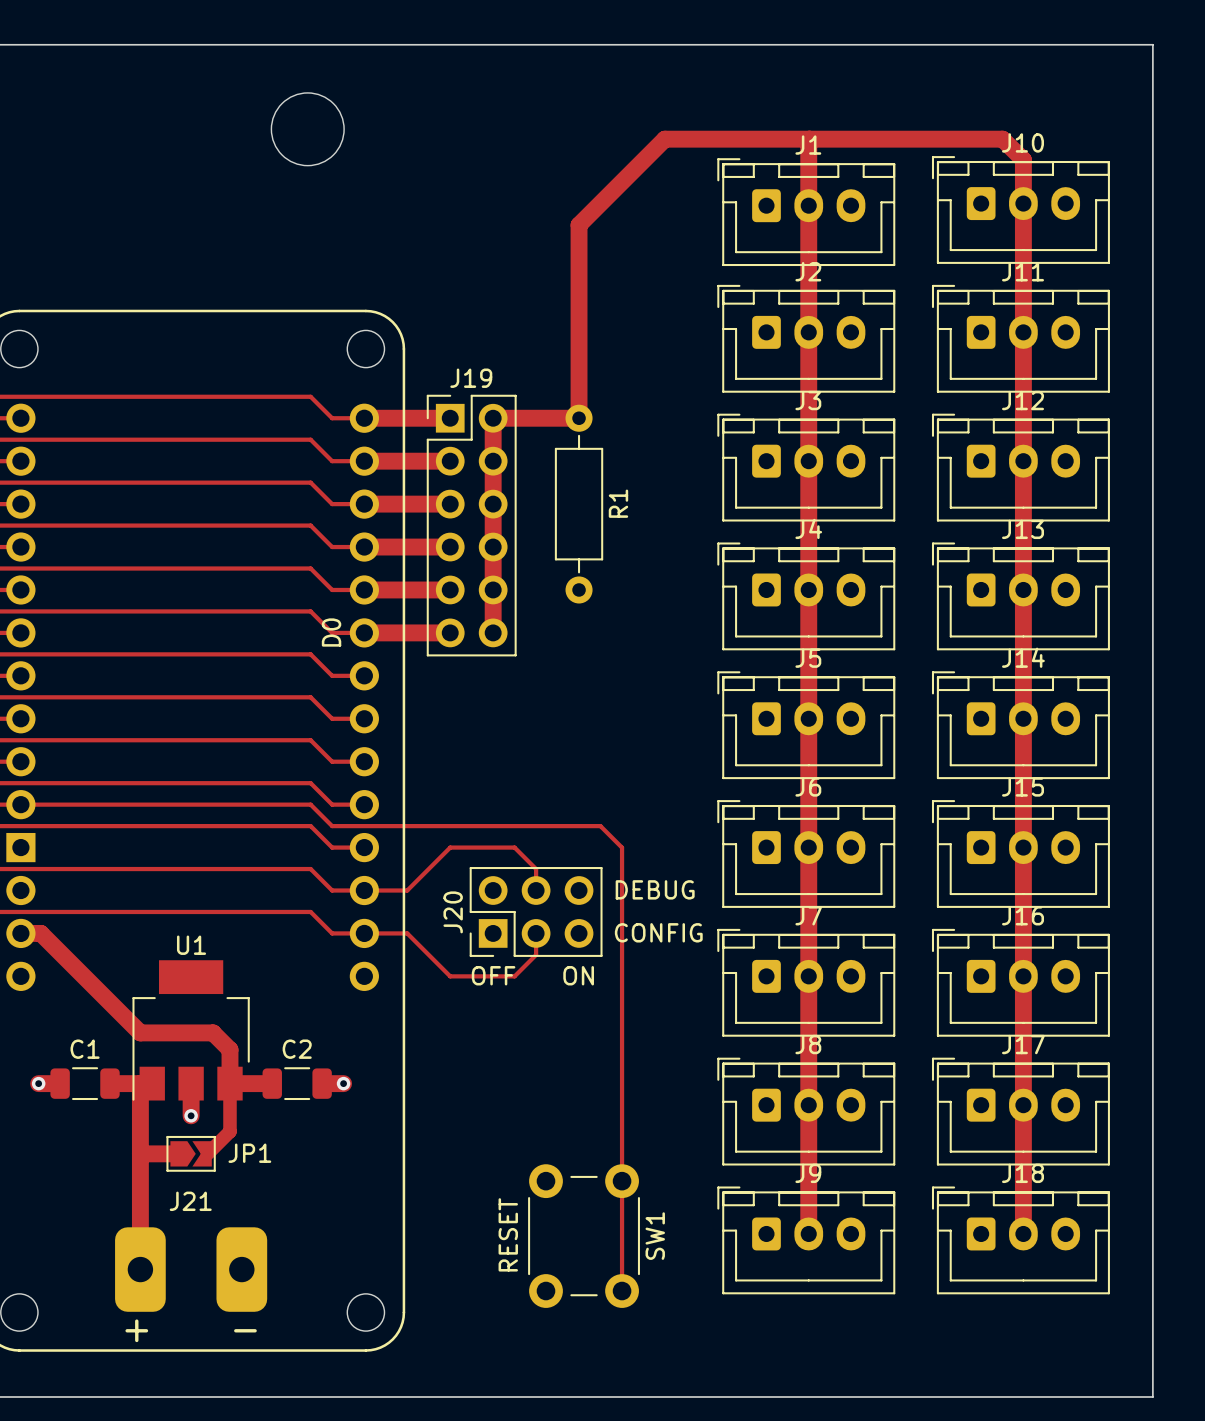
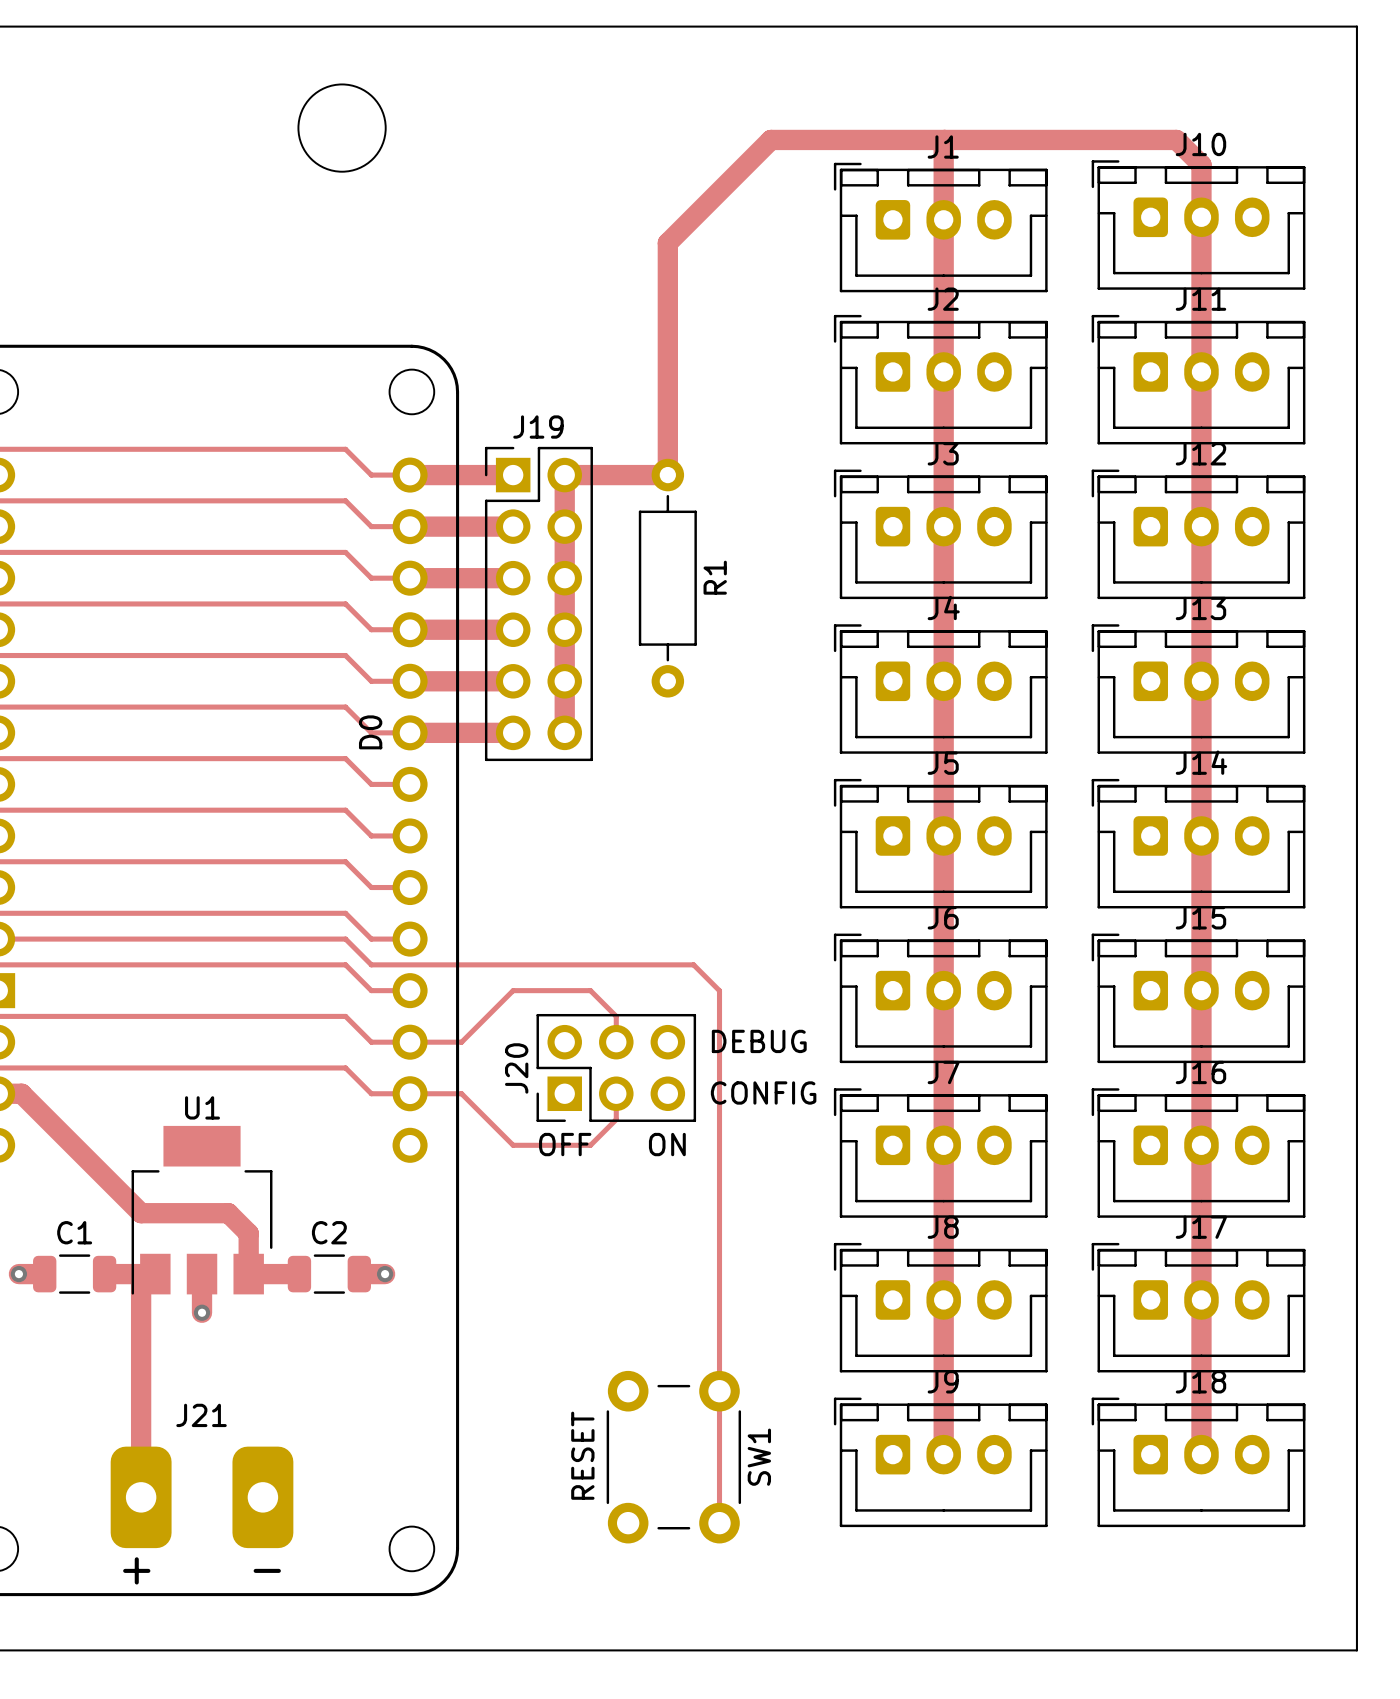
track: (229, 1083) (229, 1131) (207, 1153) -> none
track: (140, 1153) (178, 1153) -> none
JP1: (191, 1153) -> none

